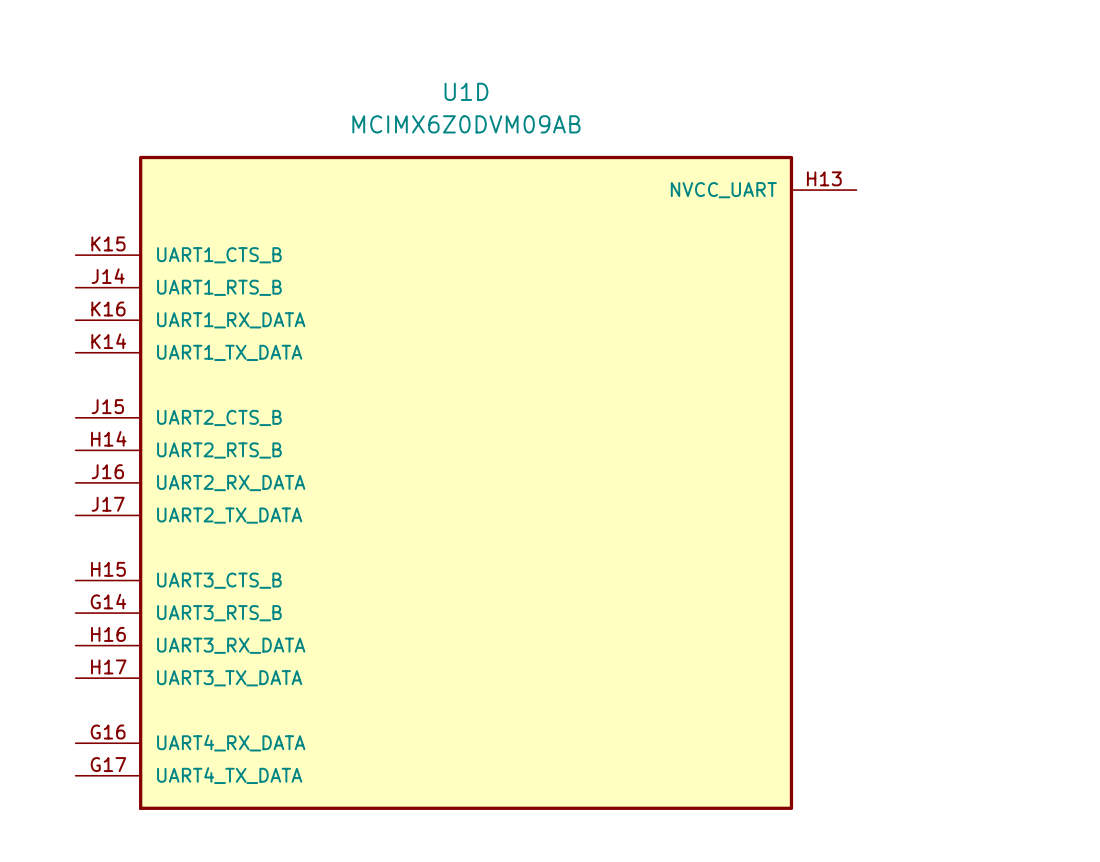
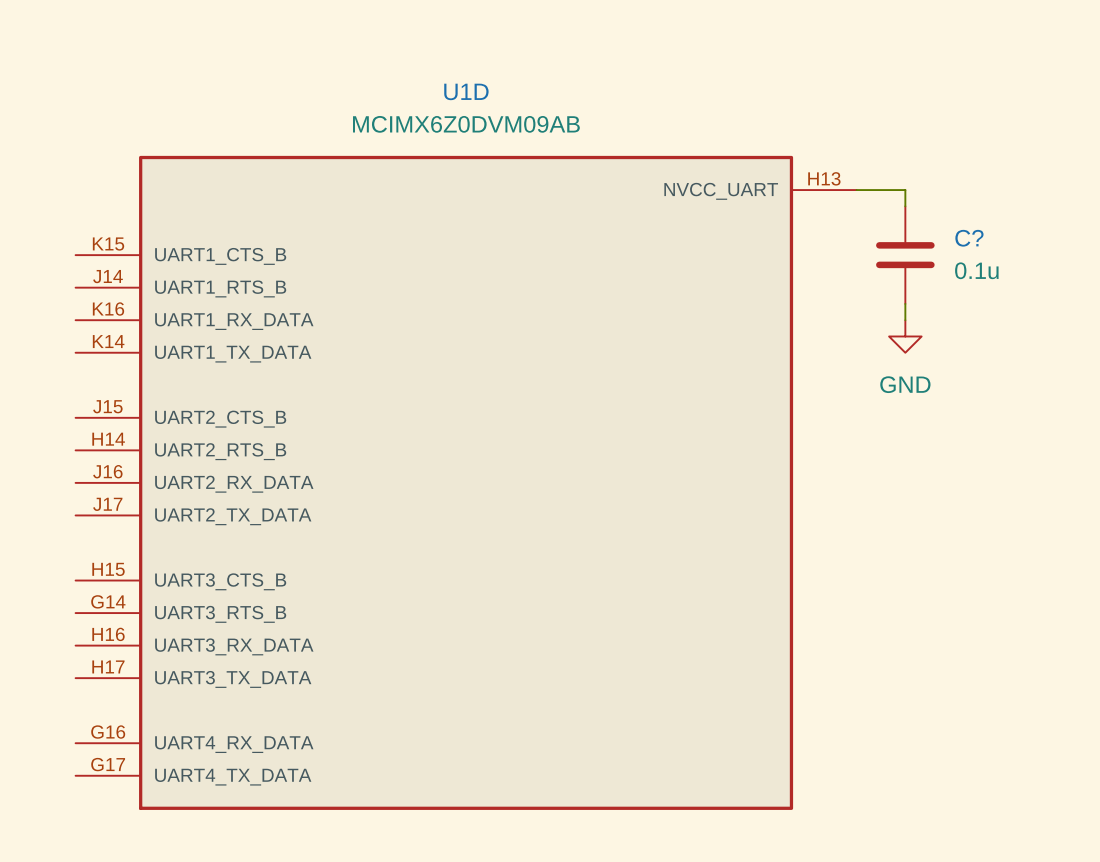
wire: none -> (856, 190) (905, 190) (905, 206)
C?: none -> 0.1u (905, 255)
wire: none -> (905, 303) (905, 320)
power symbol: none -> GND (905, 336)

